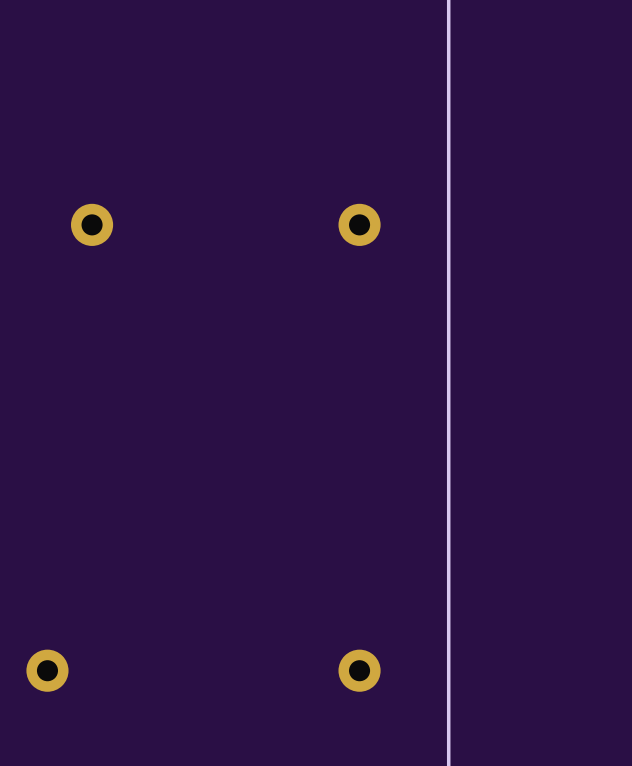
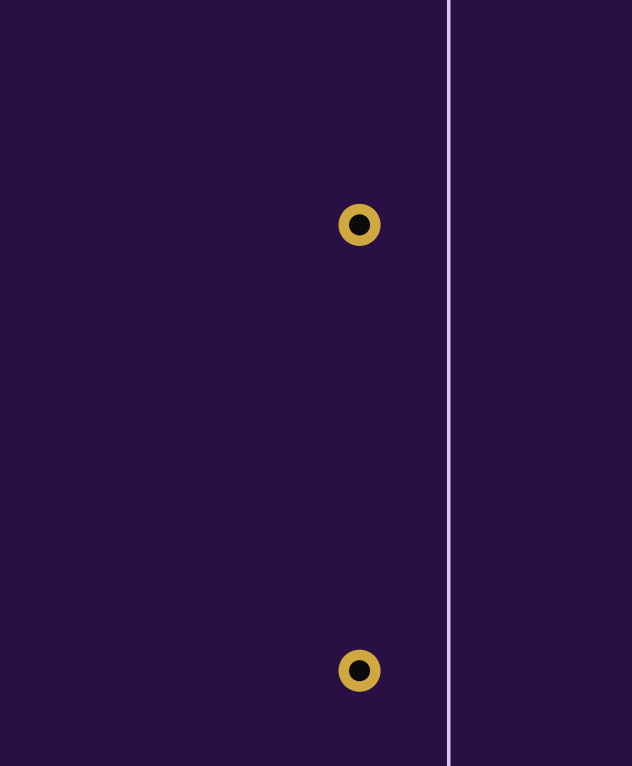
via: (92, 224) -> none
via: (47, 670) -> none

